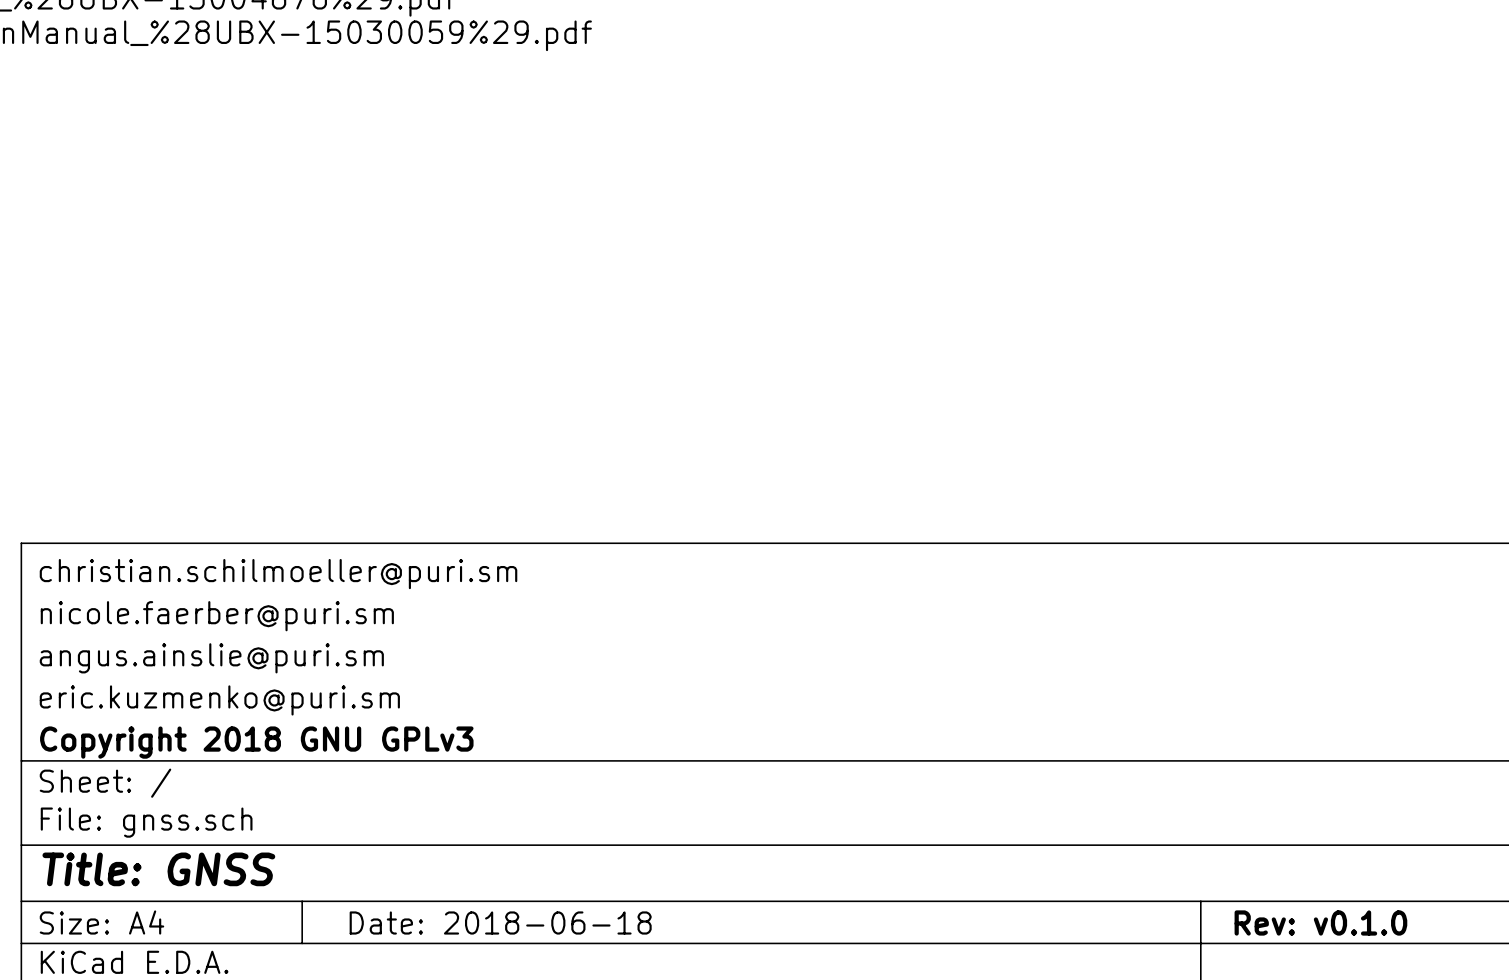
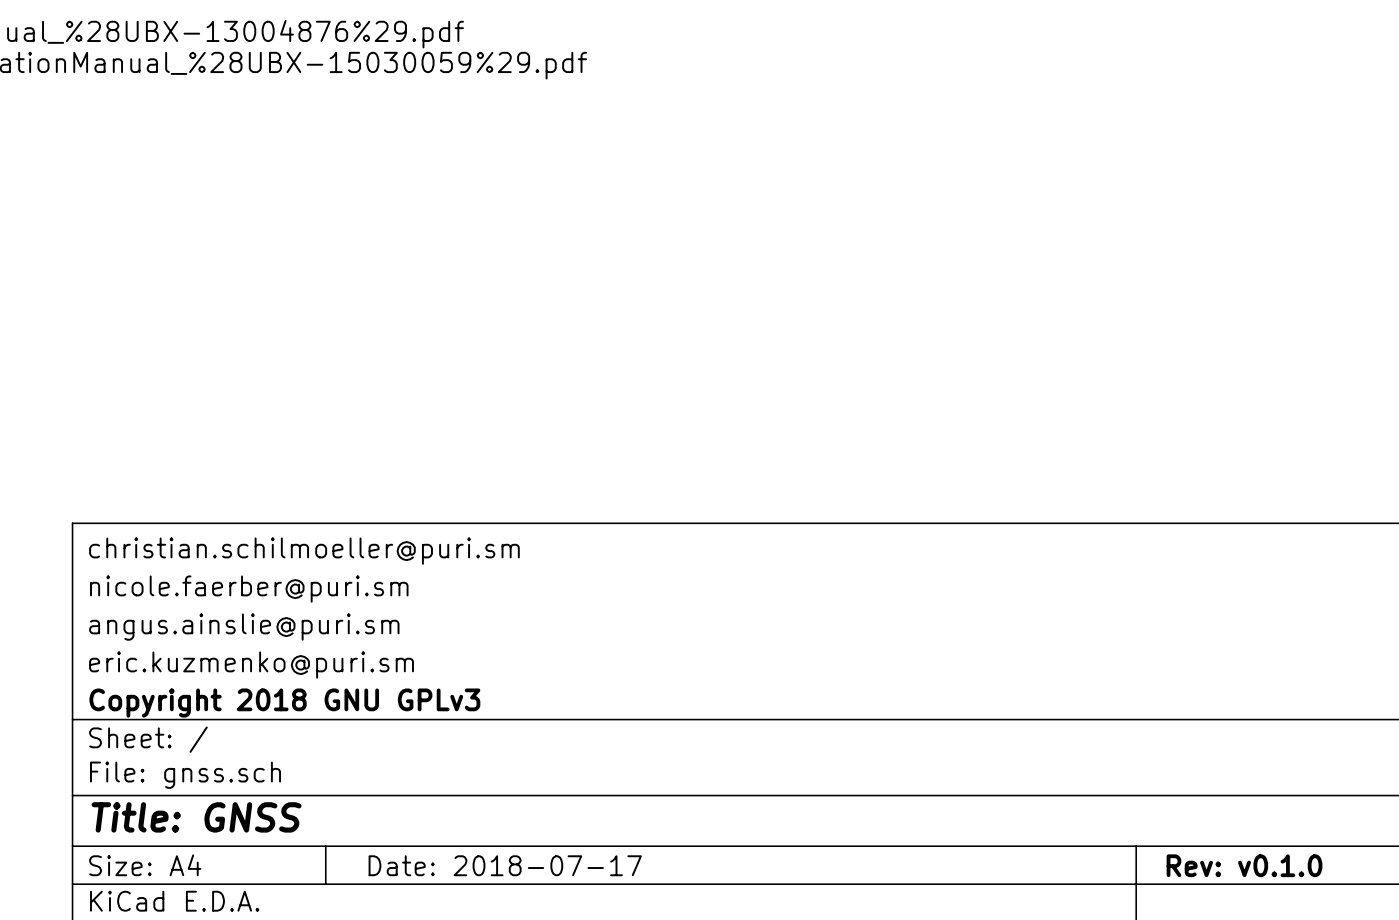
title block: Date: 2018-06-18 (500, 922) -> Date: 2018-07-17 (505, 865)

